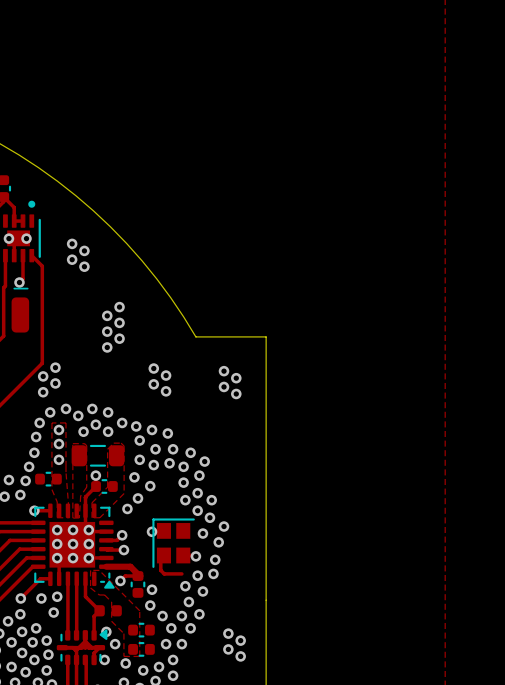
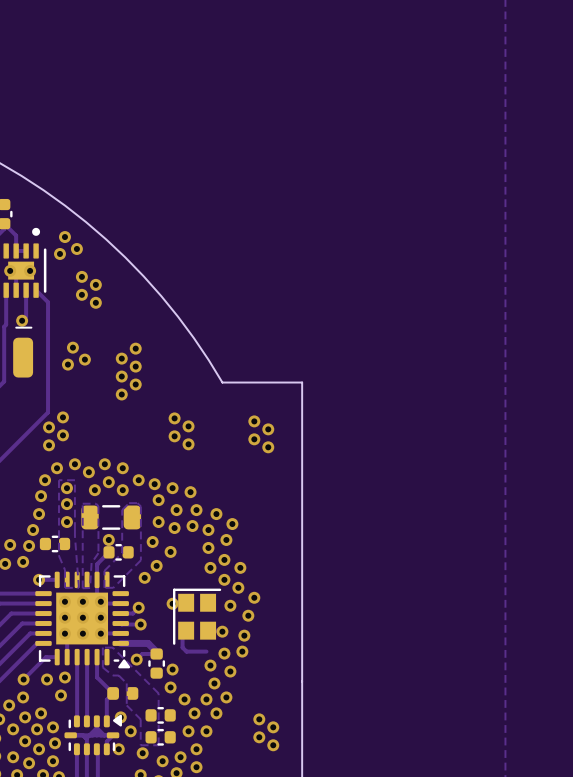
via: none -> (64, 237)
via: none -> (76, 248)
via: none -> (59, 253)
via: none -> (72, 347)
via: none -> (84, 359)
via: none -> (67, 364)

